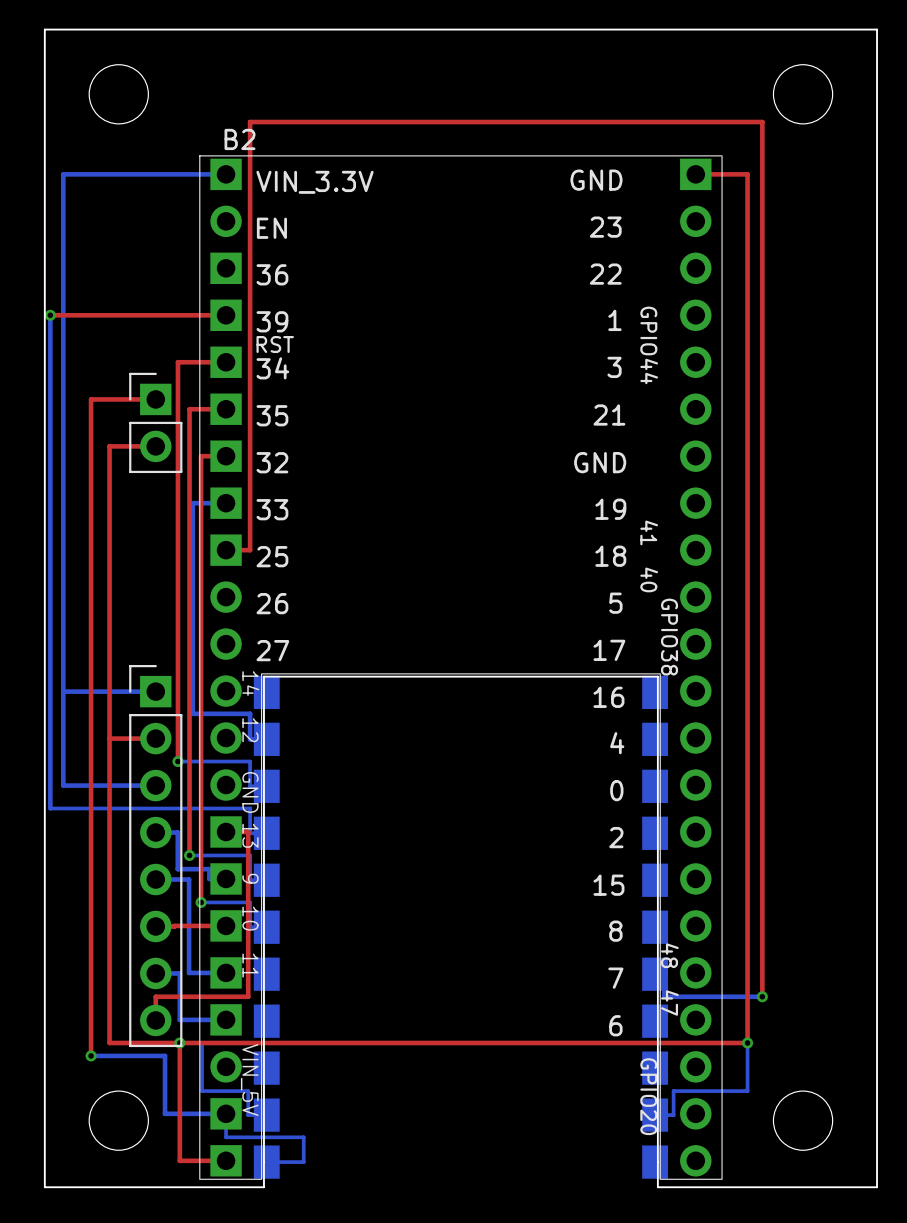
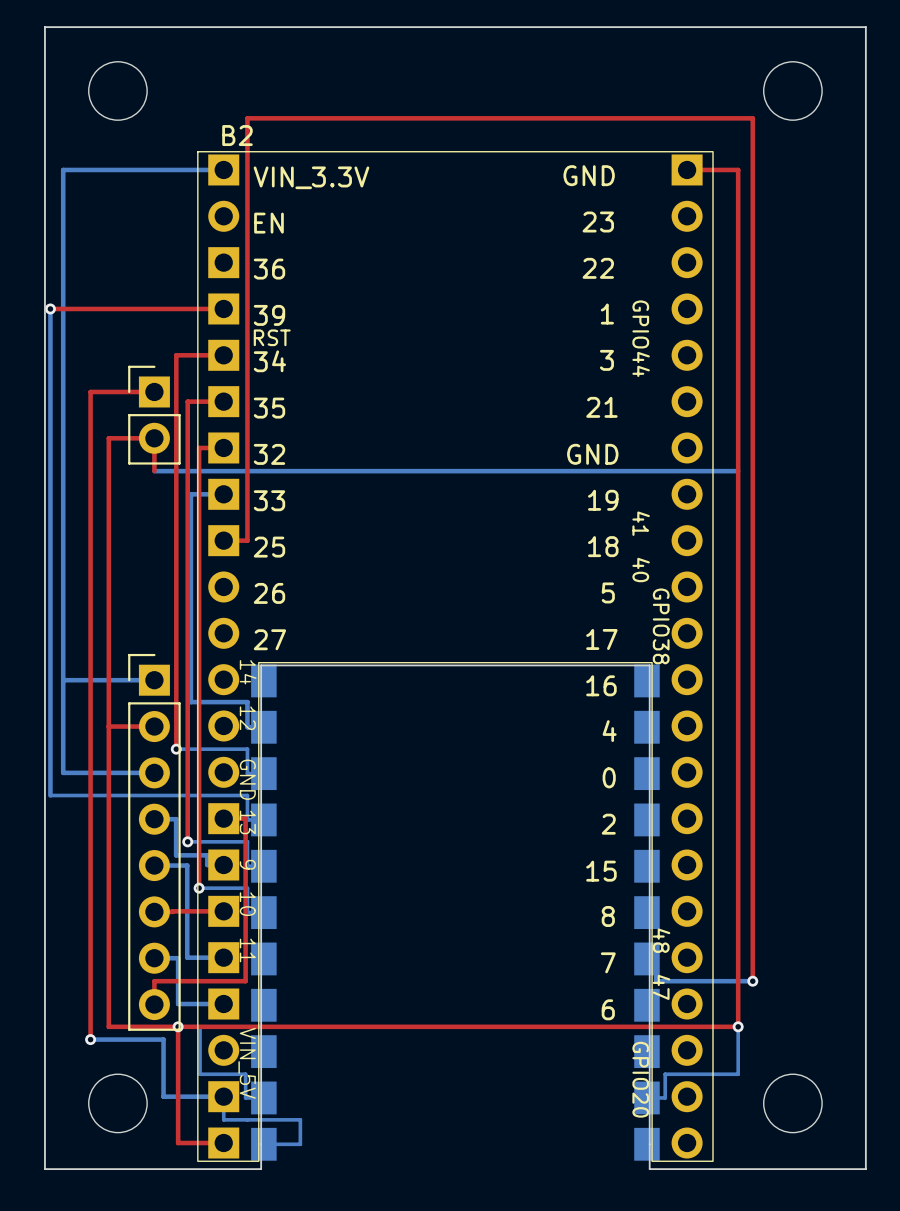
top track: none -> (154, 438) (154, 471)
bottom track: none -> (154, 471) (738, 471)

